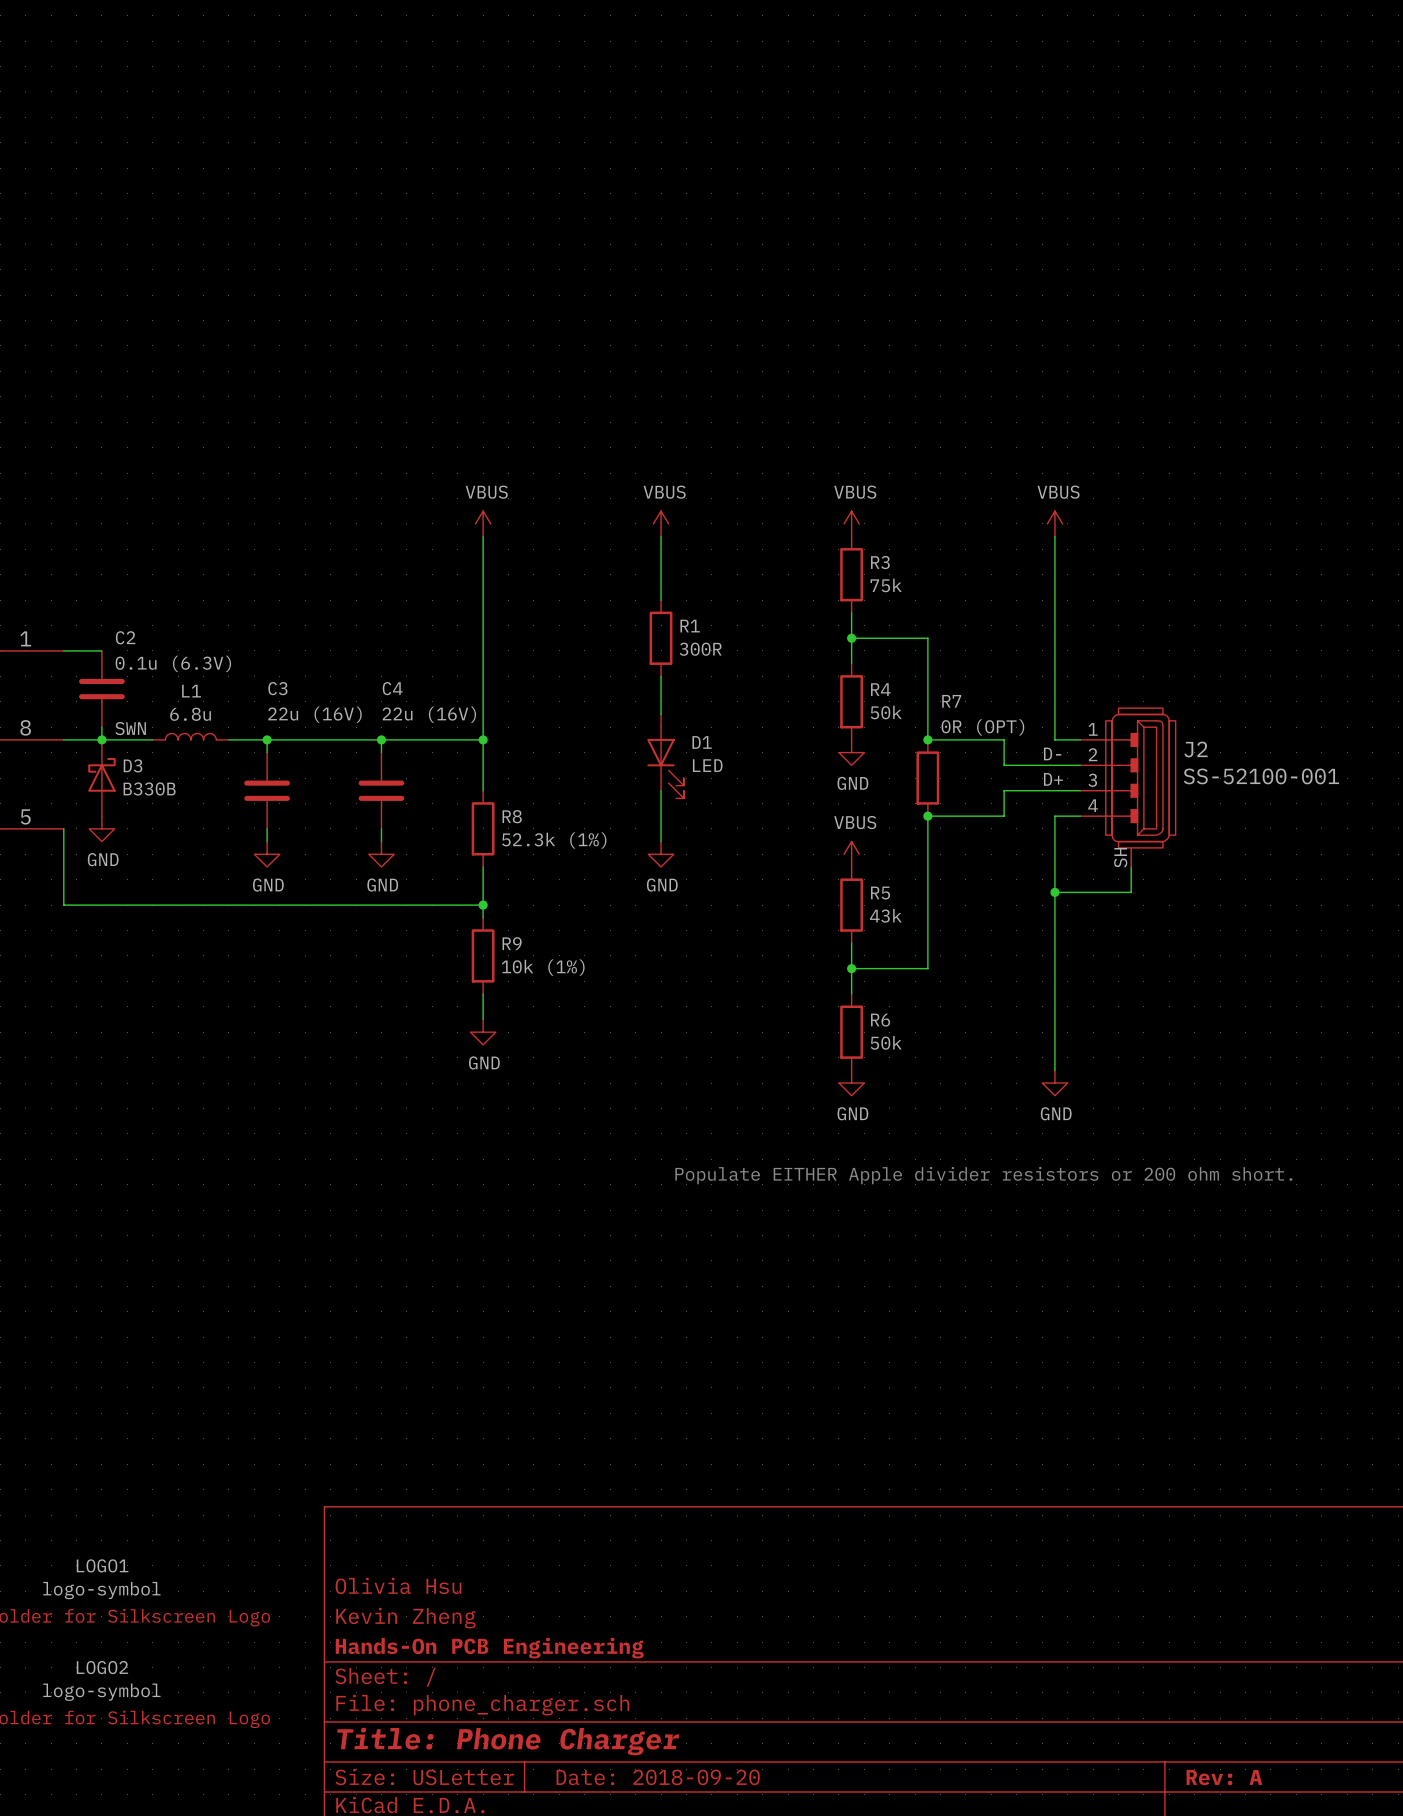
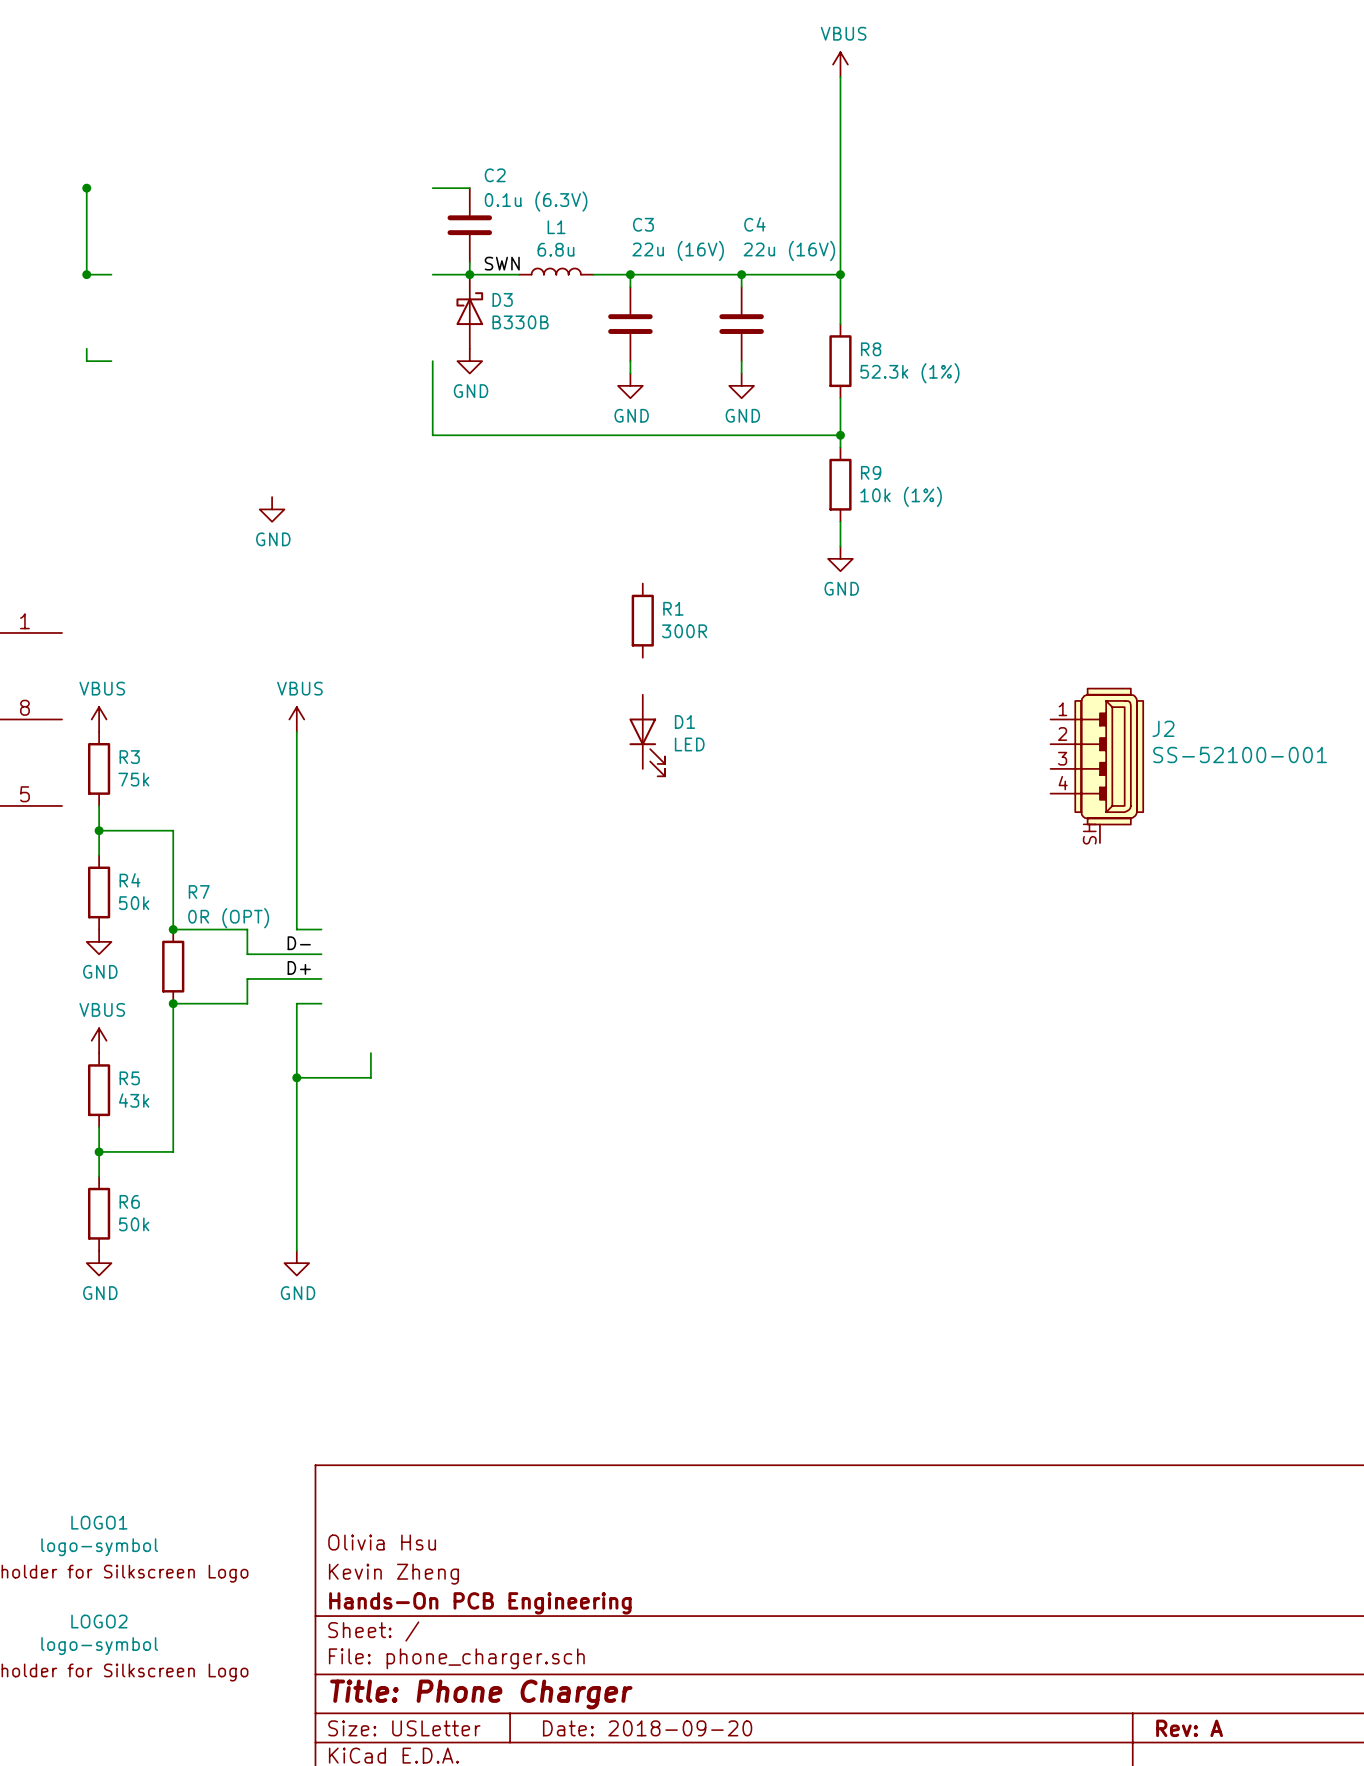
power symbol: none -> VBUS (840, 64)
wire: none -> (840, 76) (840, 324)
wire: none -> (86, 188) (86, 274) (111, 274)
junction: none -> (86, 188)
wire: none -> (432, 188) (469, 188)
wire: none -> (469, 262) (469, 274)
label: none -> SWN (502, 263)
junction: none -> (86, 274)
wire: none -> (432, 274) (519, 274)
junction: none -> (469, 274)
wire: none -> (593, 274) (840, 274)
wire: none -> (630, 274) (630, 287)
junction: none -> (630, 274)
wire: none -> (741, 274) (741, 287)
junction: none -> (741, 274)
junction: none -> (840, 274)
wire: none -> (86, 348) (86, 361) (111, 361)
wire: none -> (432, 361) (432, 435) (840, 435)
power symbol: none -> GND (469, 361)
wire: none -> (630, 361) (630, 373)
wire: none -> (741, 361) (741, 373)
power symbol: none -> GND (630, 385)
power symbol: none -> GND (741, 385)
junction: none -> (840, 435)
power symbol: none -> GND (272, 509)
power symbol: VBUS (483, 523) -> none
power symbol: VBUS (661, 523) -> none
power symbol: VBUS (851, 523) -> none
power symbol: VBUS (1054, 523) -> none
wire: (483, 536) (483, 790) -> none
wire: (661, 536) (661, 600) -> none
wire: none -> (840, 521) (840, 546)
wire: (1054, 536) (1054, 739) (1080, 739) -> none
R3 position: (851, 574) -> (99, 768)
power symbol: none -> GND (840, 558)
wire: (851, 612) (851, 663) -> (840, 398) (840, 447)
wire: (851, 638) (927, 638) (927, 739) (1004, 739) (1004, 765) (1080, 765) -> none
junction: (851, 638) -> none
wire: (63, 650) (101, 650) -> none
wire: (661, 676) (661, 714) -> none
C2 position: (101, 689) -> (469, 225)
R4 position: (851, 701) -> (99, 892)
label: SWN (130, 728) -> none
L1 position: (190, 736) -> (556, 271)
wire: (63, 739) (152, 739) -> none
power symbol: none -> VBUS (99, 719)
junction: (101, 739) -> none
wire: (228, 739) (483, 739) -> none
wire: (267, 739) (267, 752) -> none
junction: (267, 739) -> none
power symbol: none -> VBUS (296, 719)
wire: (381, 739) (381, 752) -> none
junction: (381, 739) -> none
junction: (483, 739) -> none
junction: (927, 739) -> none
wire: none -> (296, 731) (296, 929) (321, 929)
power symbol: GND (851, 752) -> none
label: D- (1052, 753) -> none
D3 position: (101, 778) -> (469, 311)
R7 position: (927, 778) -> (173, 966)
label: D+ (1053, 779) -> none
C3 position: (267, 790) -> (630, 324)
C4 position: (381, 790) -> (741, 324)
wire: (661, 790) (661, 841) -> none
wire: (1080, 790) (1004, 790) (1004, 816) (927, 816) (927, 968) (851, 968) -> none
junction: (927, 816) -> none
wire: (1080, 816) (1054, 816) (1054, 1070) -> none
wire: (63, 828) (63, 905) (483, 905) -> none
wire: none -> (99, 805) (99, 855)
power symbol: GND (101, 828) -> none
wire: (267, 828) (267, 841) -> none
wire: (381, 828) (381, 841) -> none
R8 position: (483, 828) -> (840, 361)
wire: none -> (99, 830) (173, 830) (173, 929) (247, 929) (247, 954) (321, 954)
junction: none -> (99, 830)
power symbol: GND (267, 854) -> none
power symbol: GND (381, 854) -> none
power symbol: GND (661, 854) -> none
power symbol: VBUS (851, 854) -> none
wire: (483, 866) (483, 917) -> none
wire: (1131, 866) (1131, 892) (1054, 892) -> none
junction: (1054, 892) -> none
junction: (483, 905) -> none
R5 position: (851, 905) -> (99, 1090)
wire: (851, 943) (851, 994) -> none
junction: none -> (173, 929)
R9 position: (483, 955) -> (840, 484)
power symbol: none -> GND (99, 941)
junction: (851, 968) -> none
label: none -> D- (299, 943)
wire: (483, 994) (483, 1019) -> none
label: none -> D+ (299, 967)
wire: none -> (321, 978) (247, 978) (247, 1003) (173, 1003) (173, 1151) (99, 1151)
junction: none -> (173, 1003)
wire: none -> (321, 1003) (296, 1003) (296, 1250)
power symbol: GND (483, 1032) -> none
R6 position: (851, 1032) -> (99, 1213)
power symbol: none -> VBUS (99, 1040)
wire: none -> (370, 1053) (370, 1077) (296, 1077)
power symbol: GND (851, 1083) -> none
power symbol: GND (1054, 1083) -> none
junction: none -> (296, 1077)
wire: none -> (99, 1127) (99, 1176)
text: Populate EITHER Apple divider resistors or 200 ohm short. (983, 1175) -> none
junction: none -> (99, 1151)
power symbol: none -> GND (99, 1263)
power symbol: none -> GND (296, 1263)

